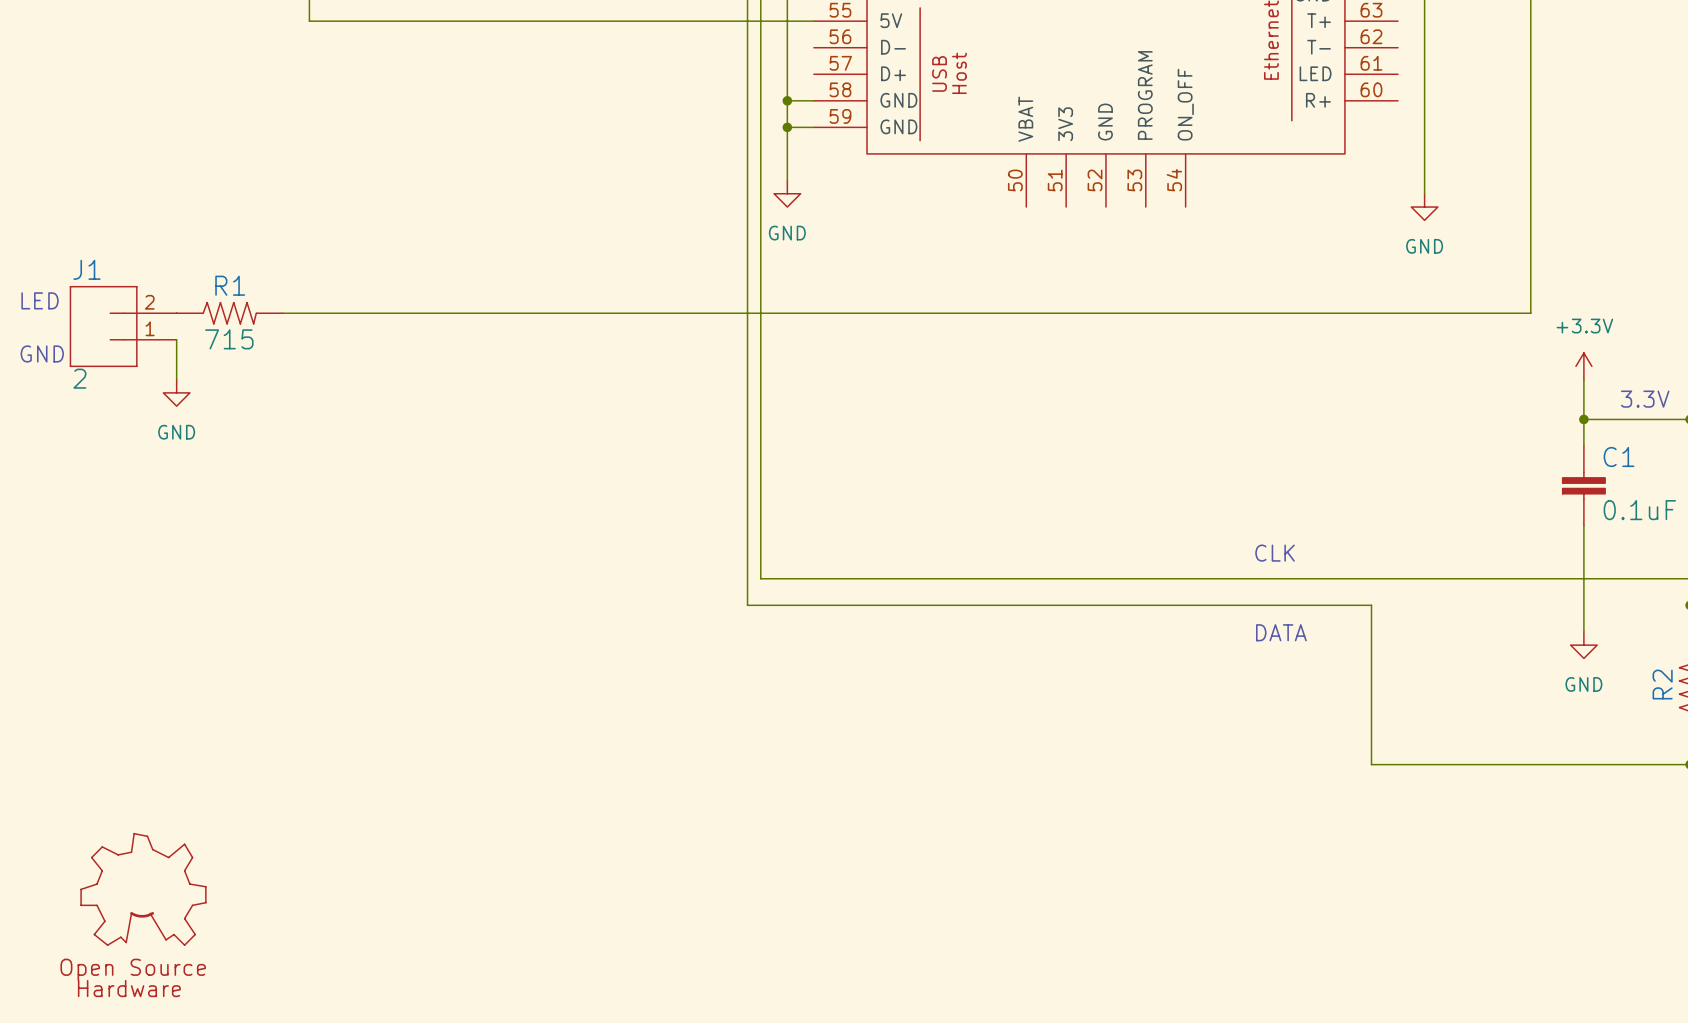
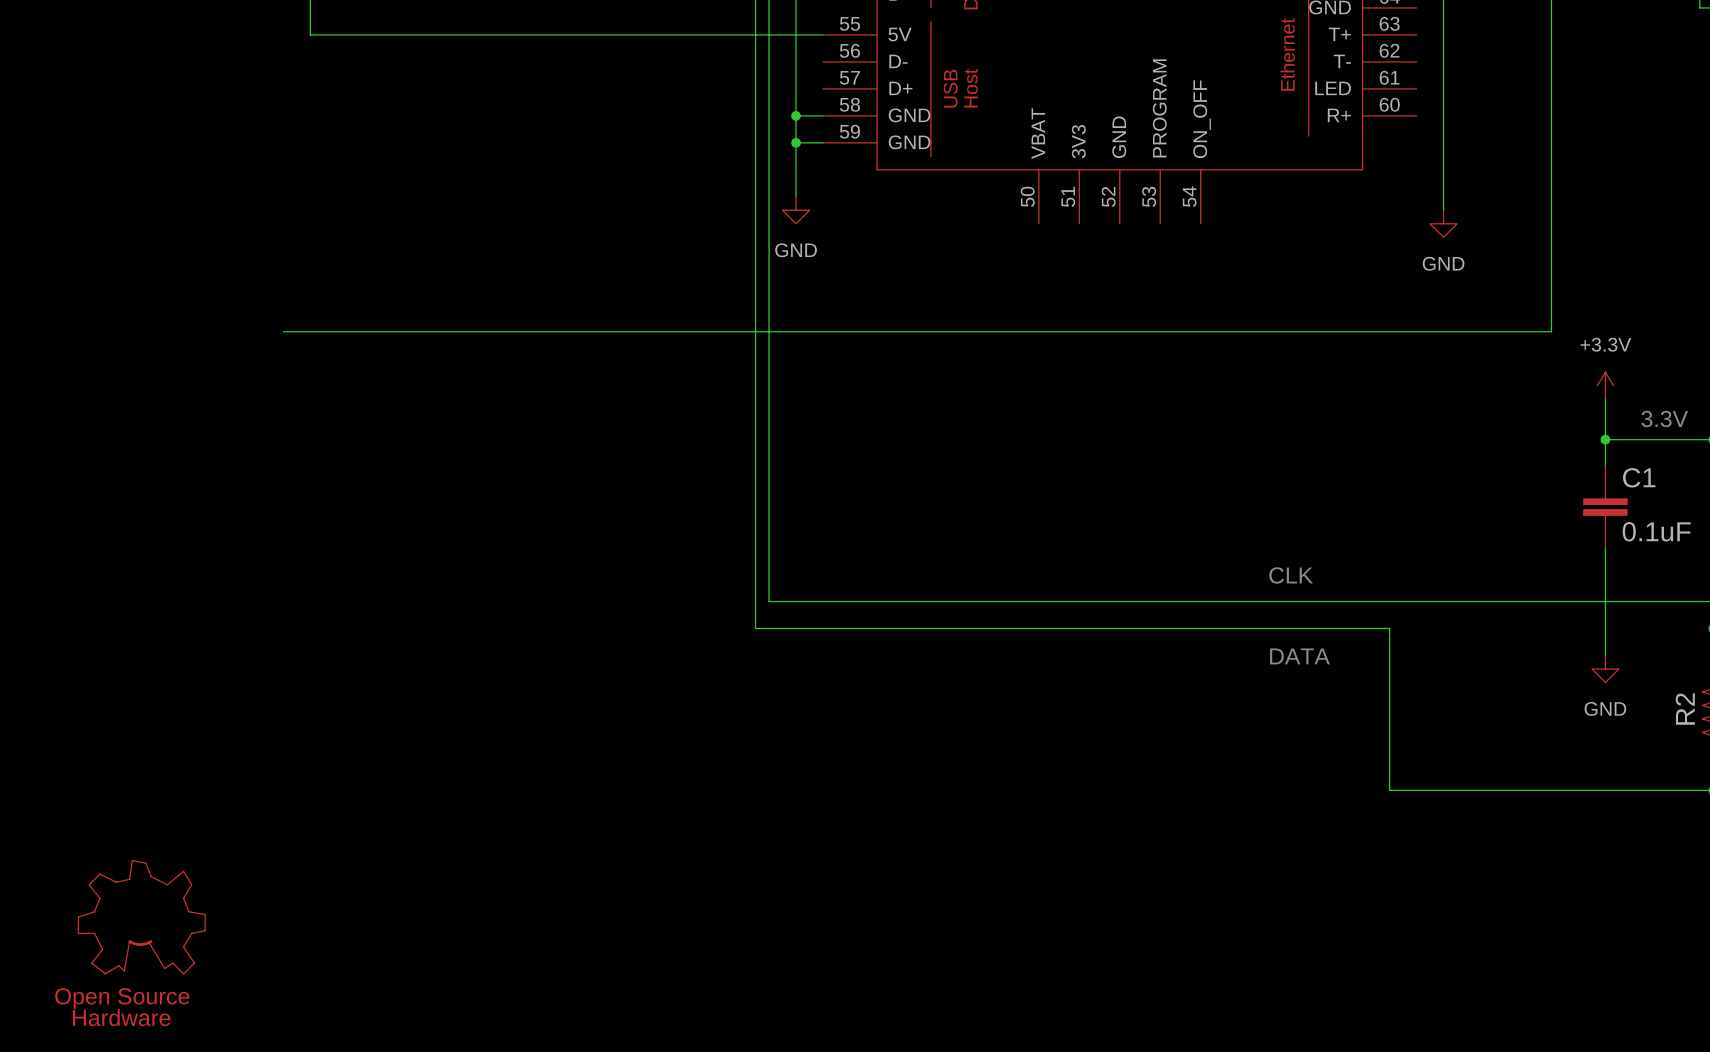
text: LED (40, 300) -> none
R1: 715 (229, 313) -> none
J1: 2 (123, 326) -> none
wire: (176, 339) (176, 379) -> none
text: GND (42, 353) -> none
power symbol: GND (176, 392) -> none

